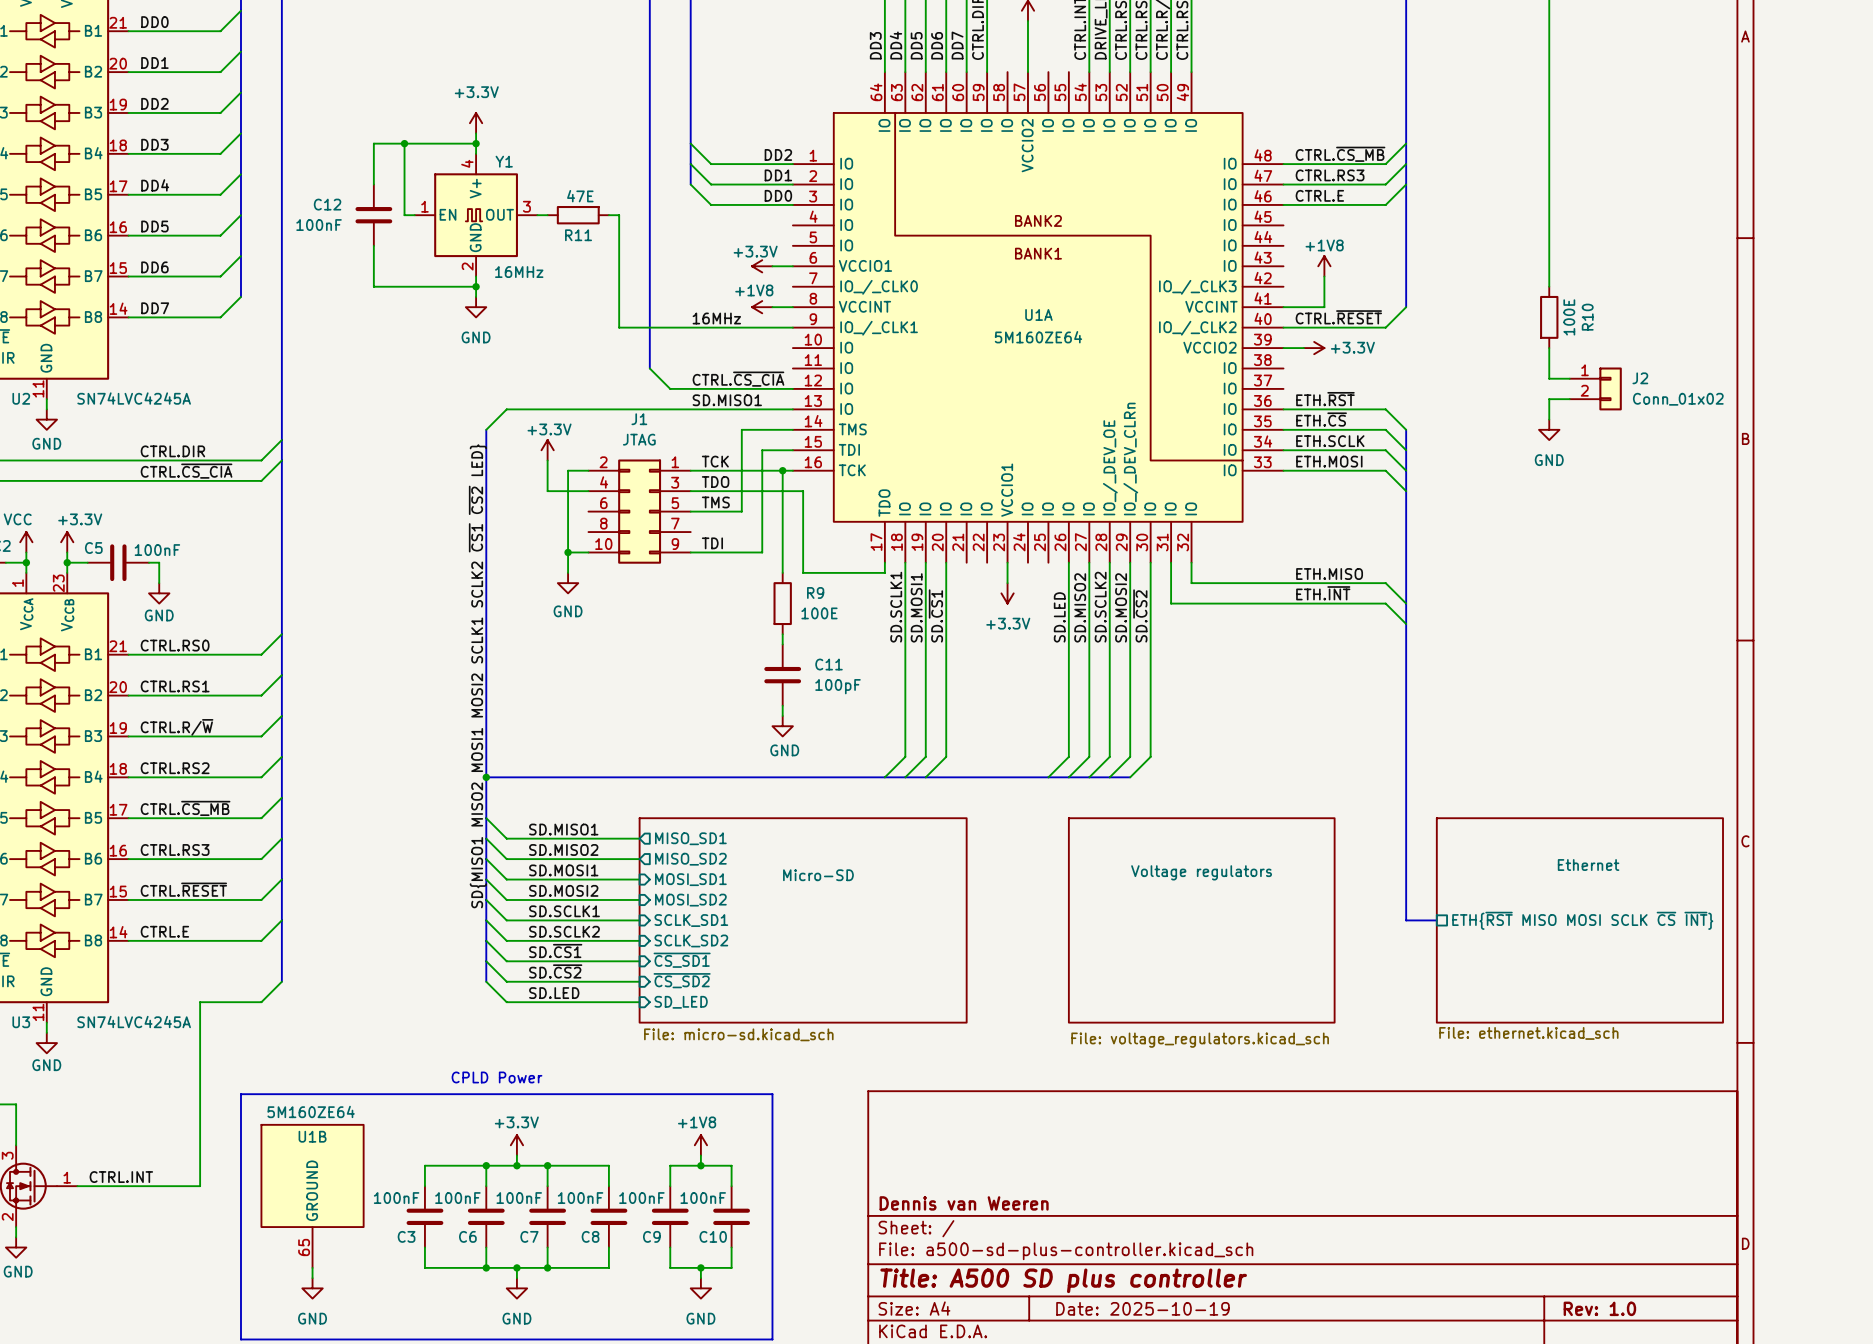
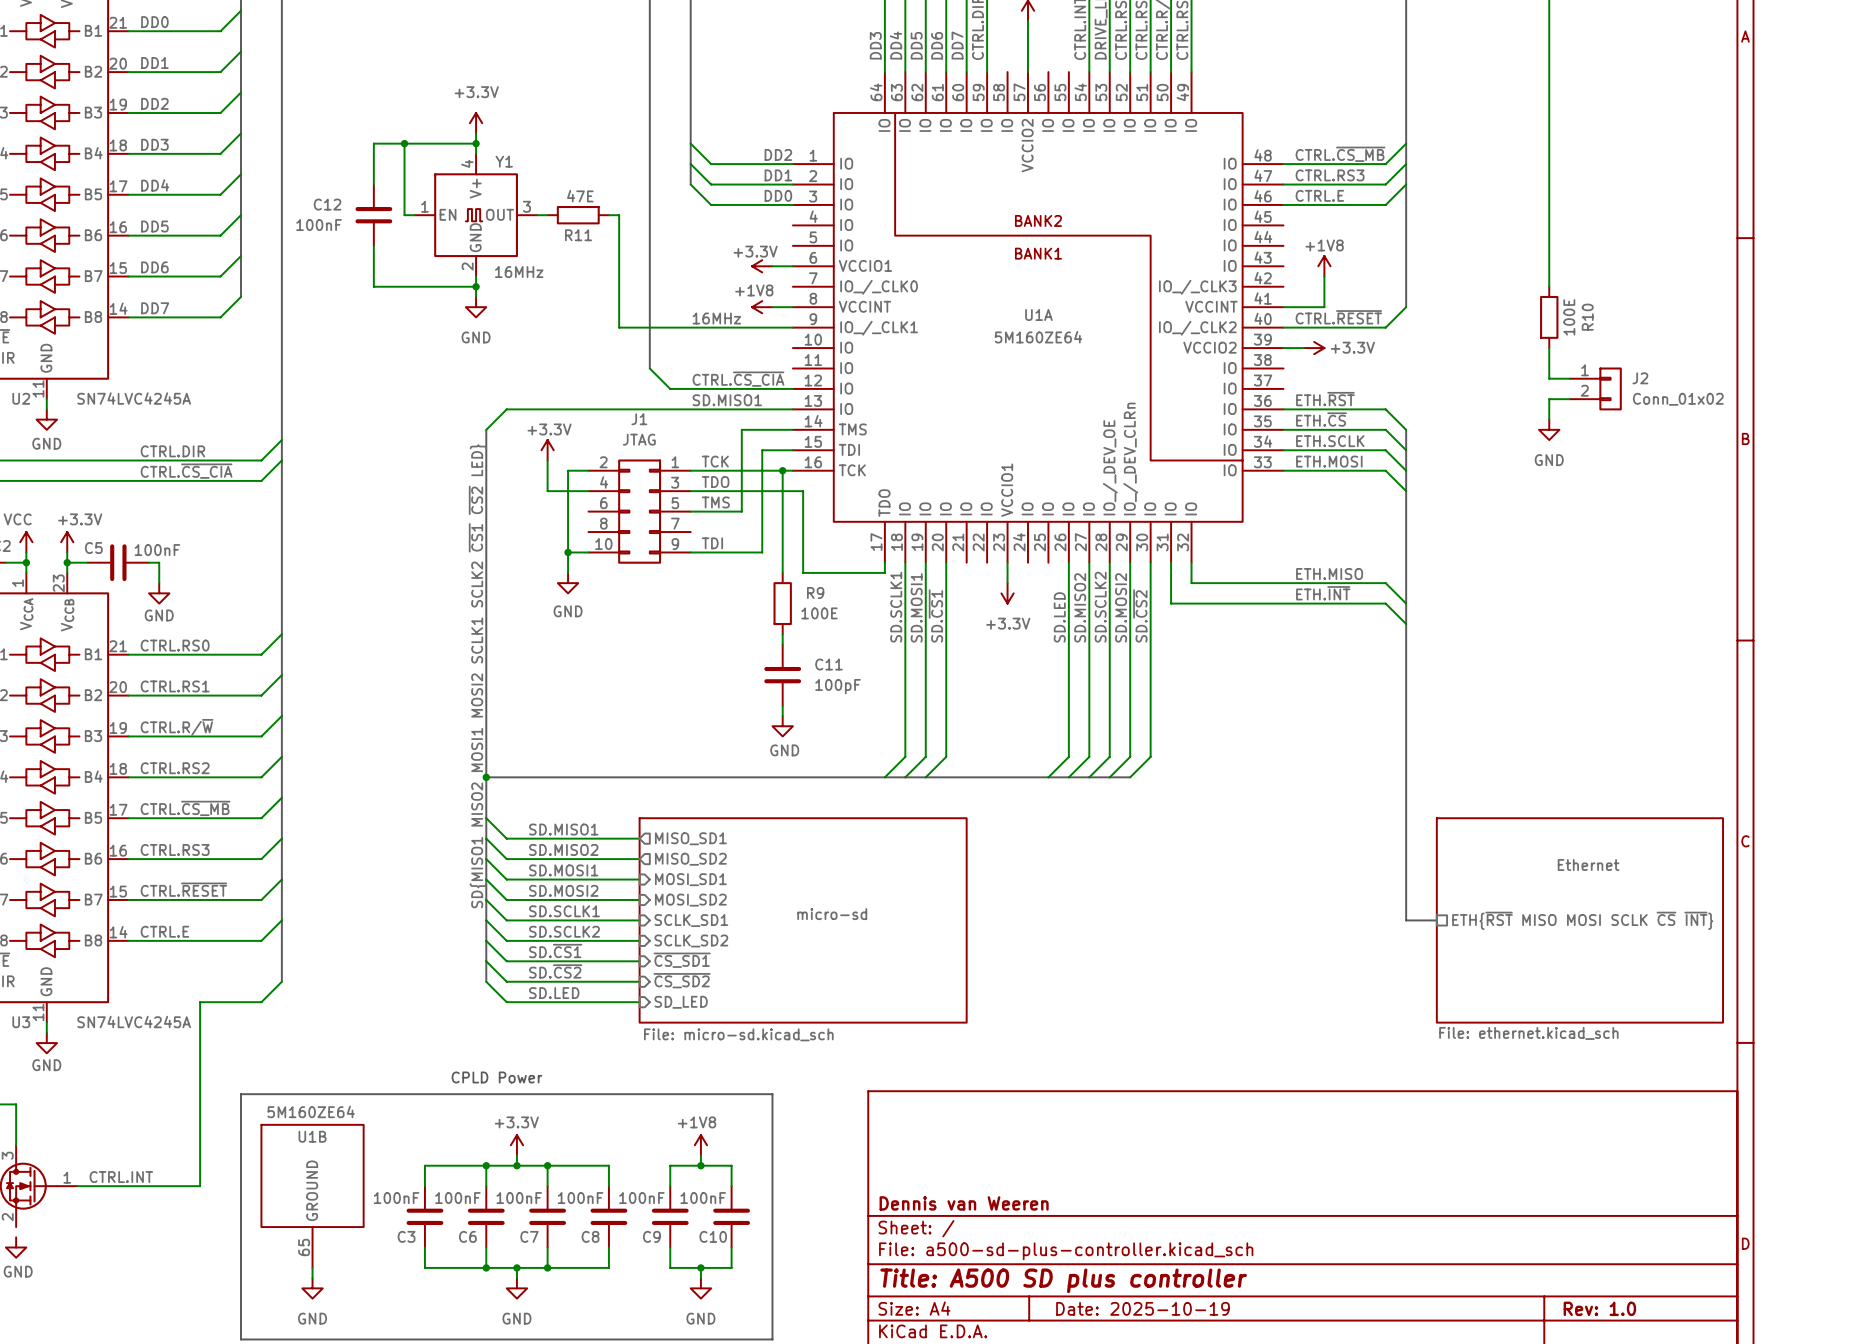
sheet Micro-SD name: Micro-SD (818, 875) -> micro-sd (832, 914)
sheet Voltage regulators: File: voltage_regulators.kicad_sch (1201, 920) -> none
wire: (16, 1227) (16, 1237) -> none

